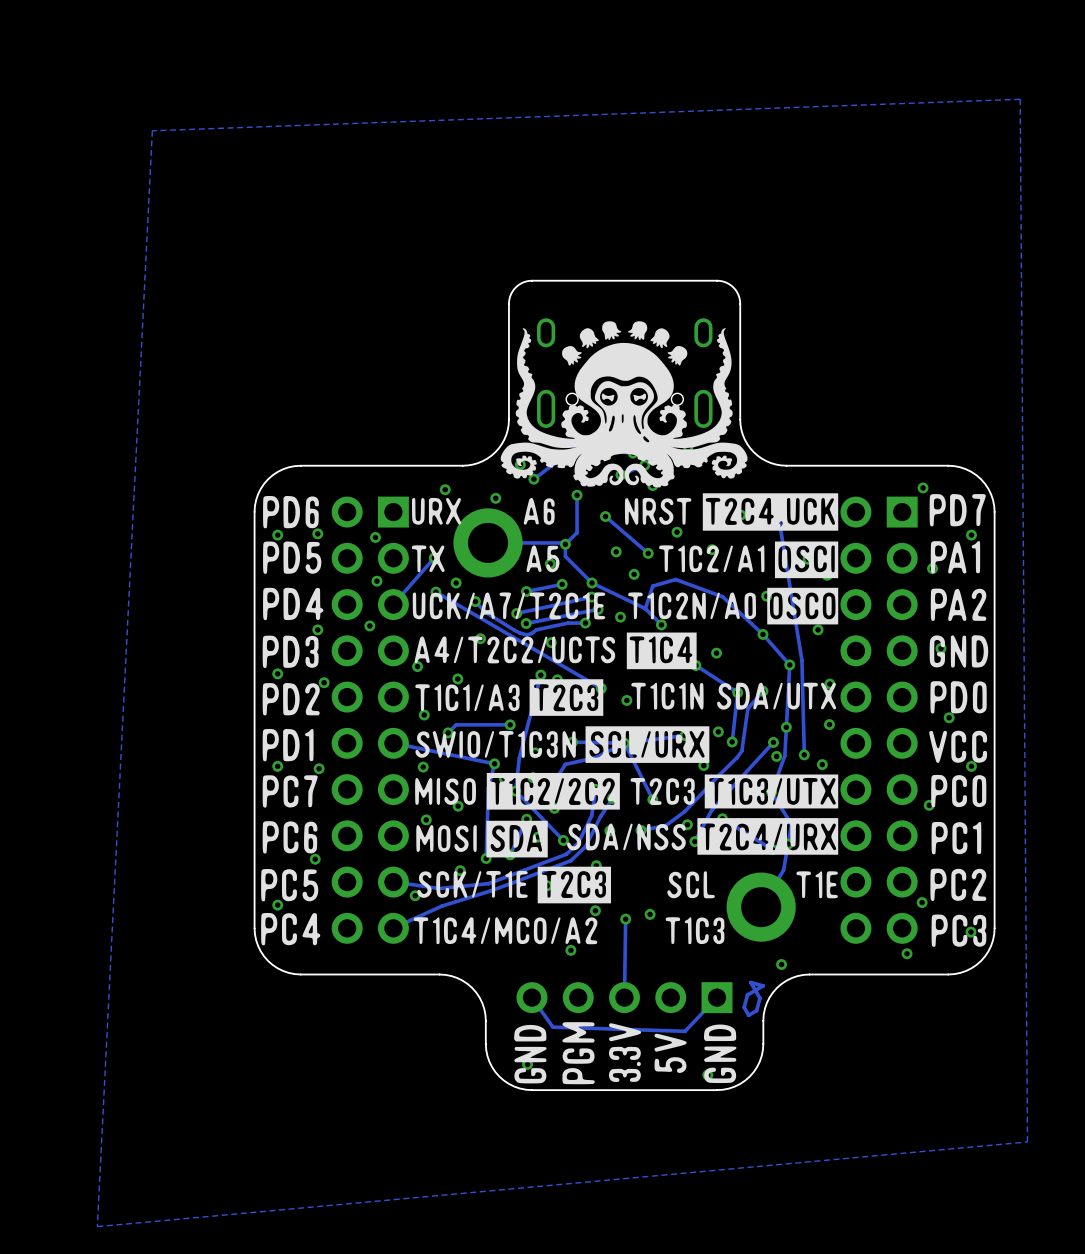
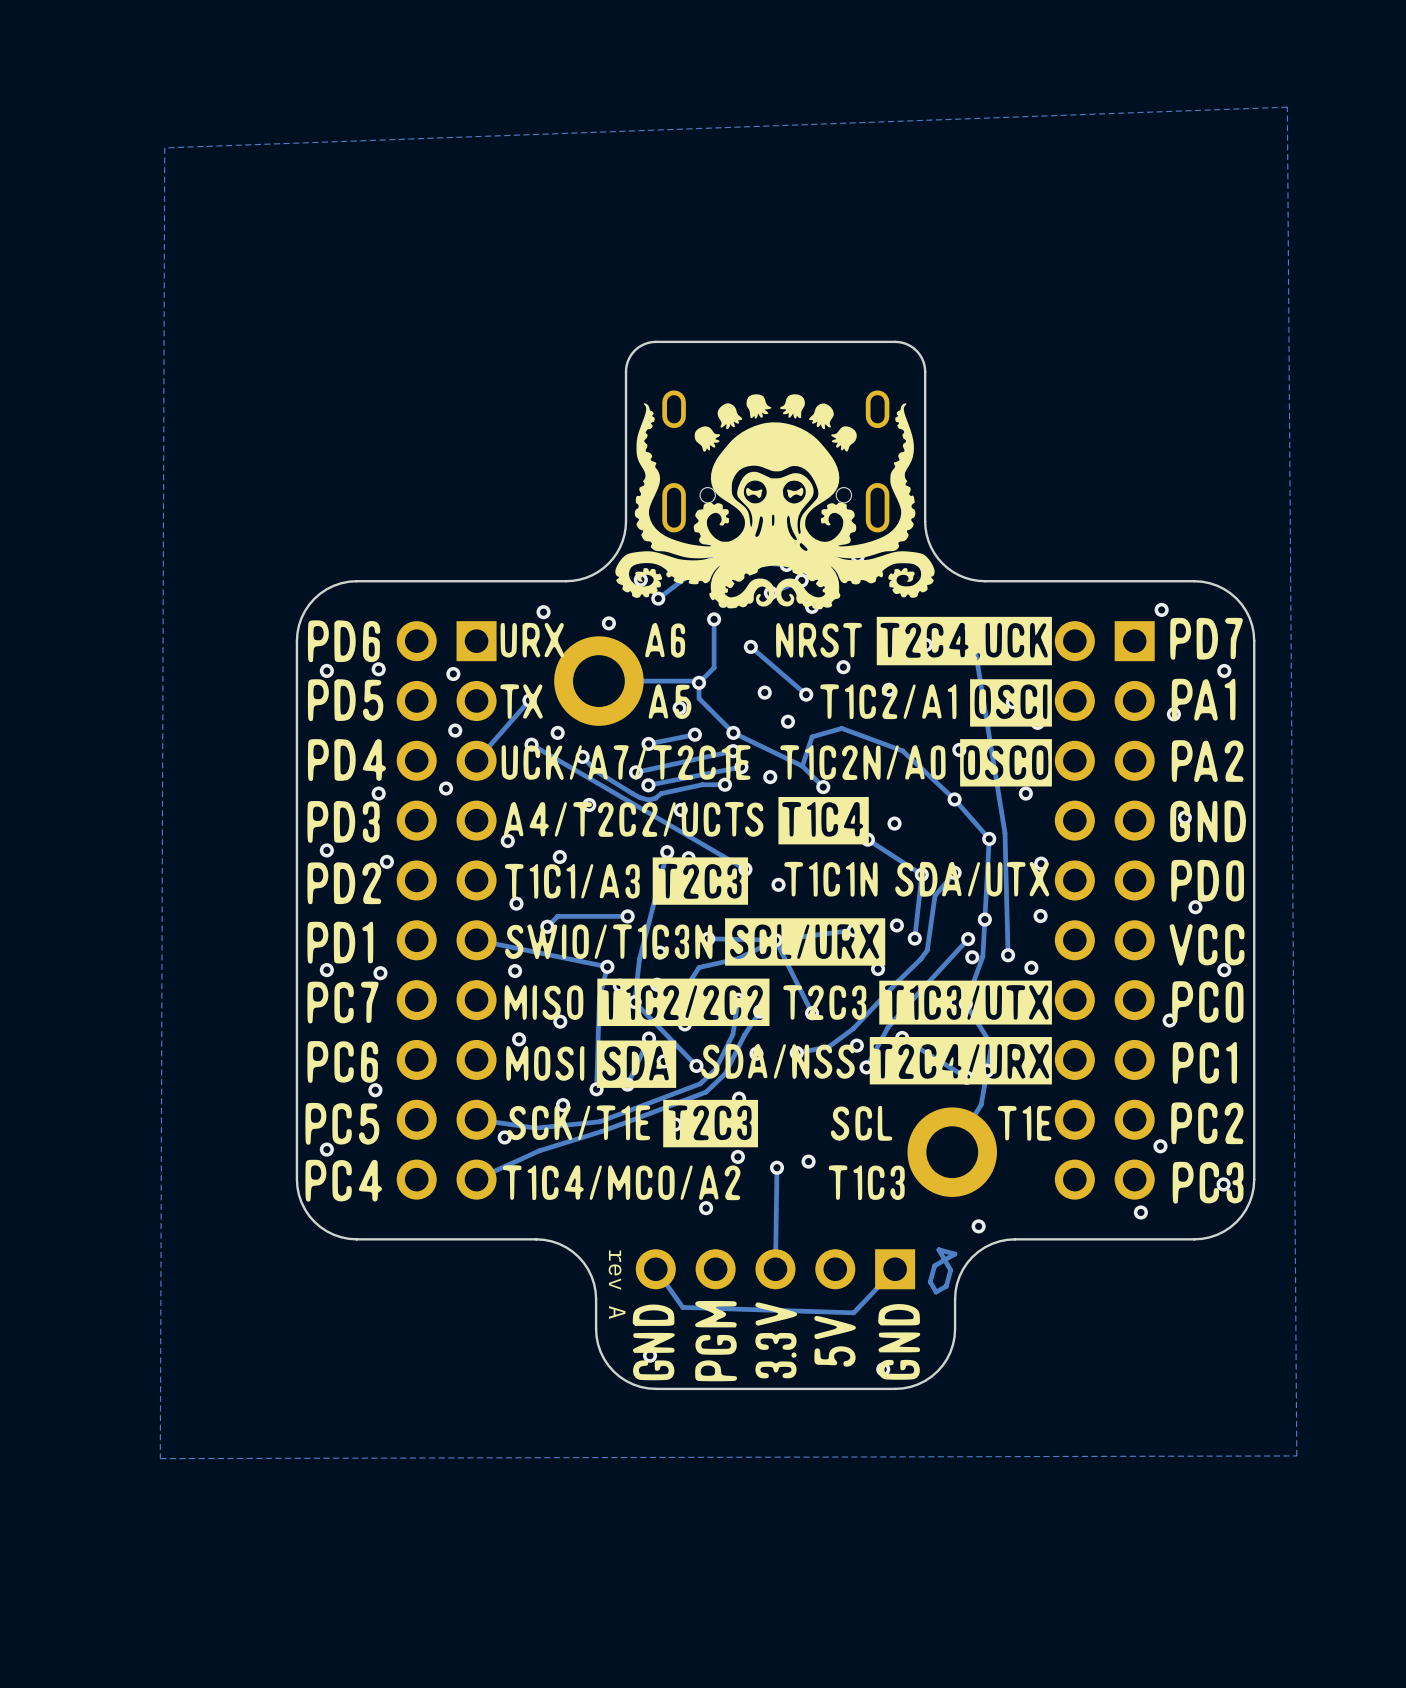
zone outline: (152, 130) (97, 1226) (1027, 1141) -> (164, 147) (160, 1458) (1296, 1455)
text: none -> rev A (617, 1284)

